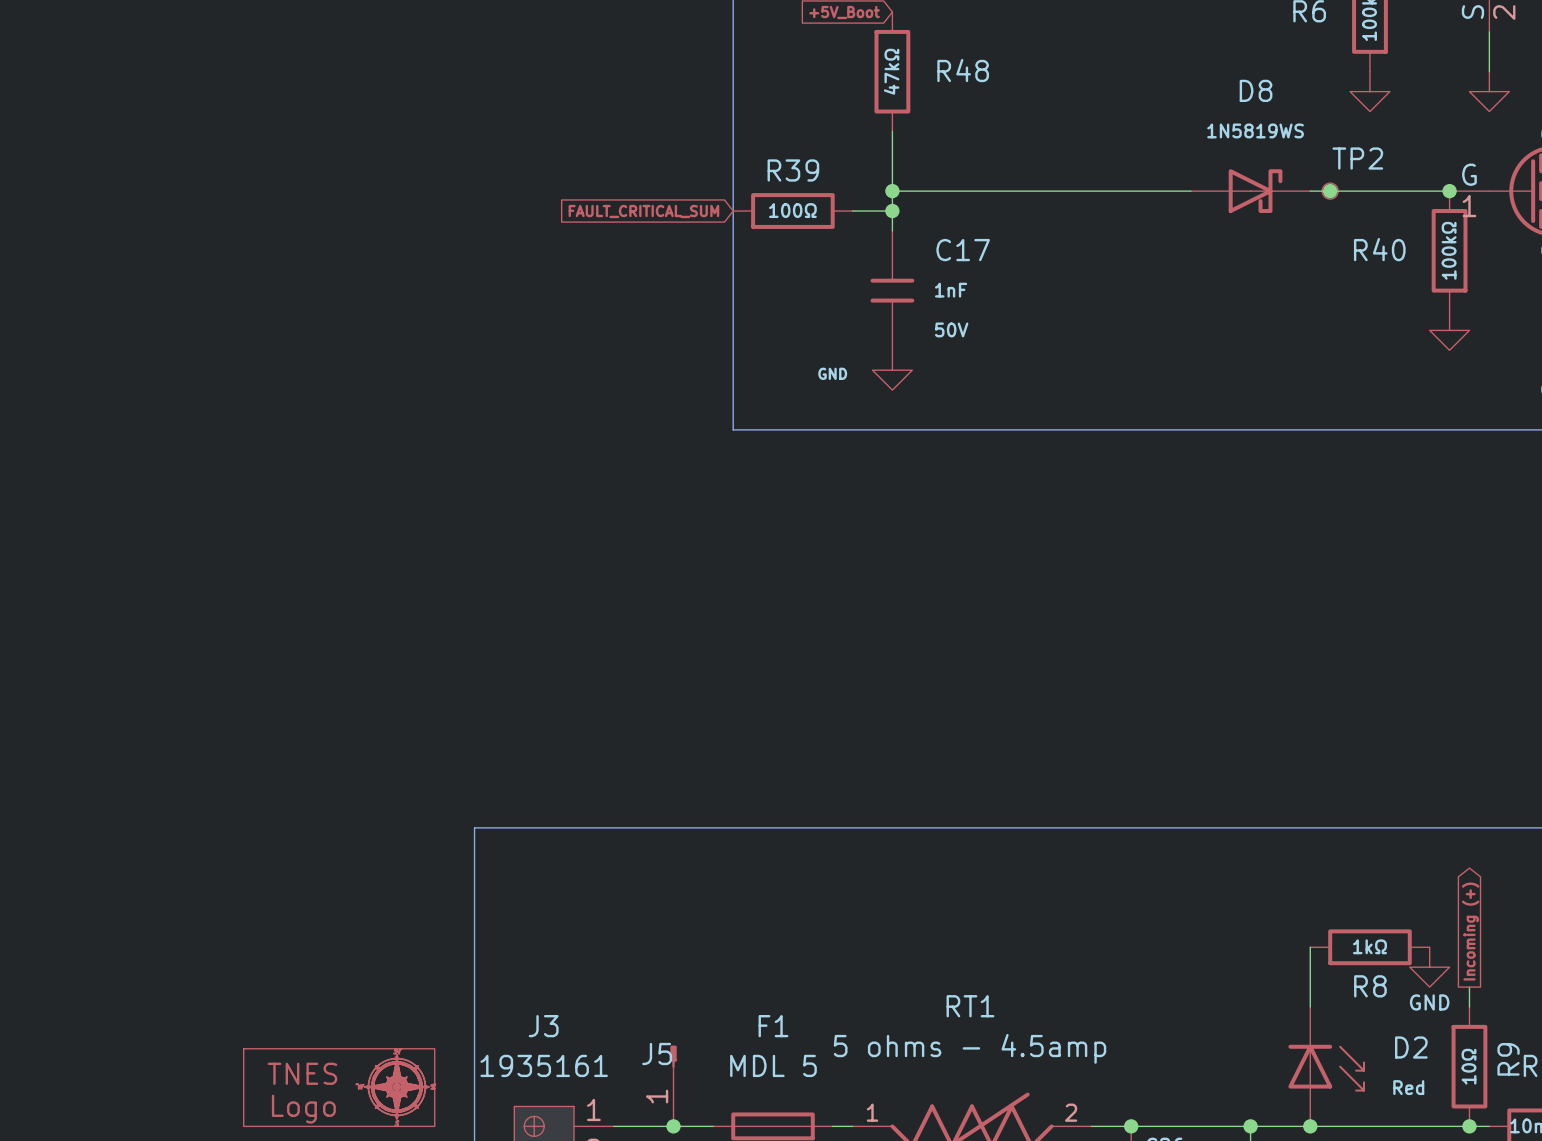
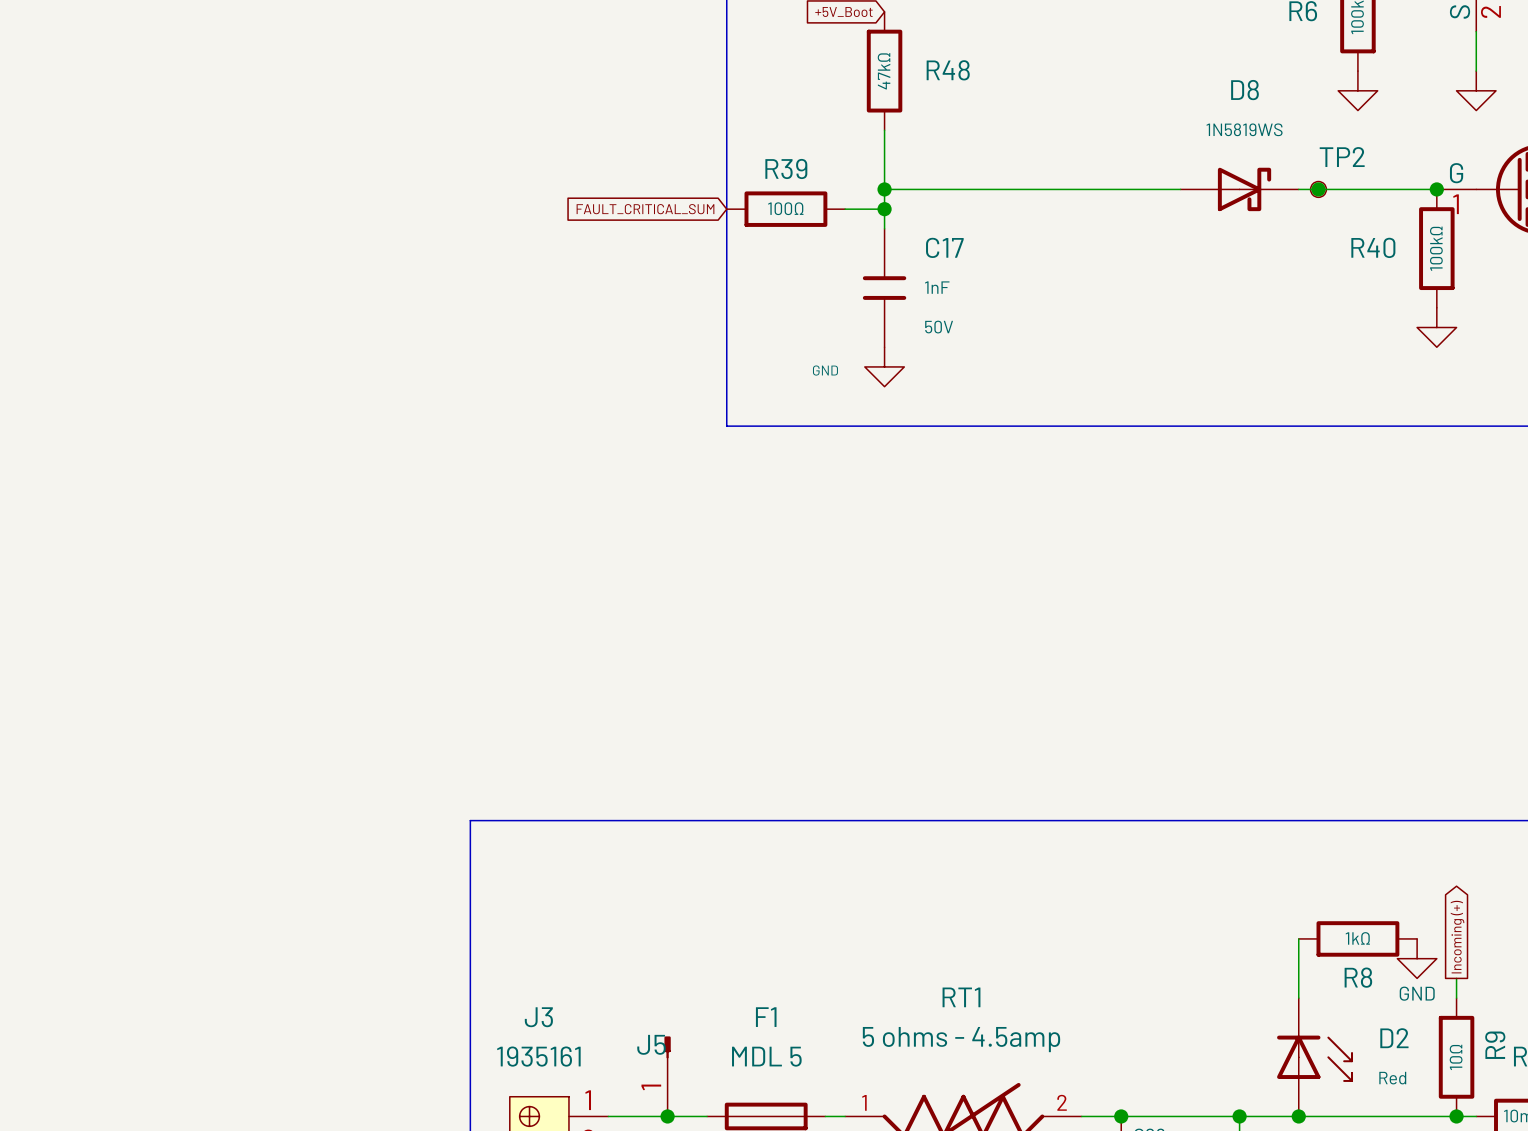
part: (339, 1087) -> none

